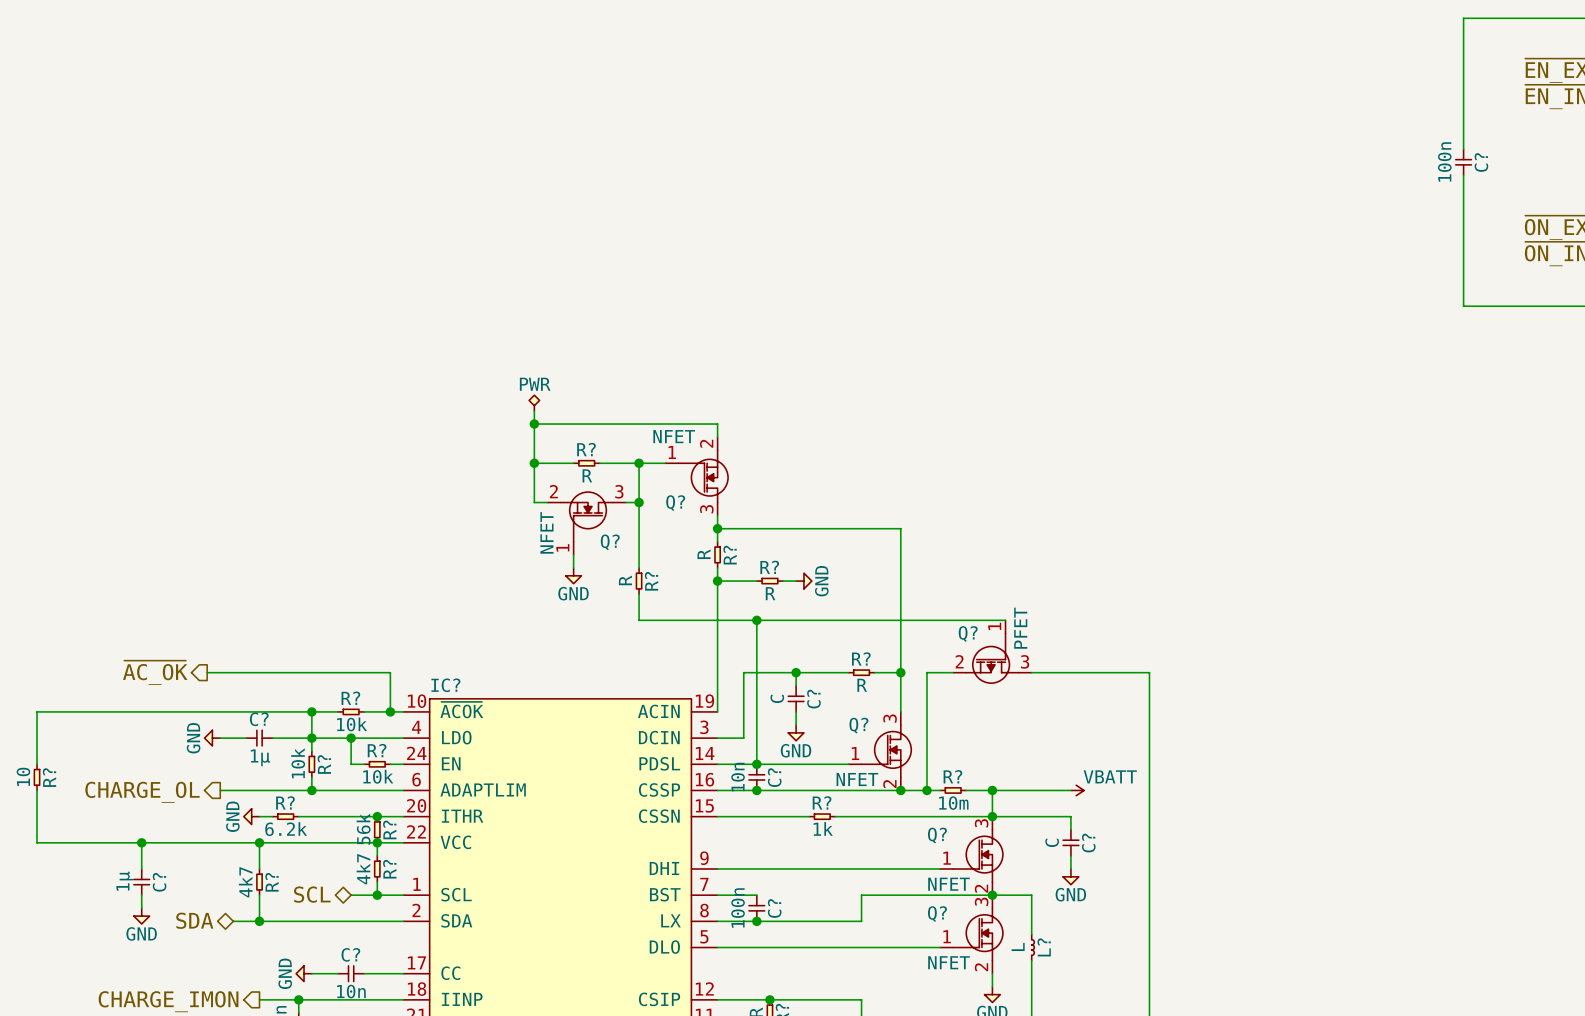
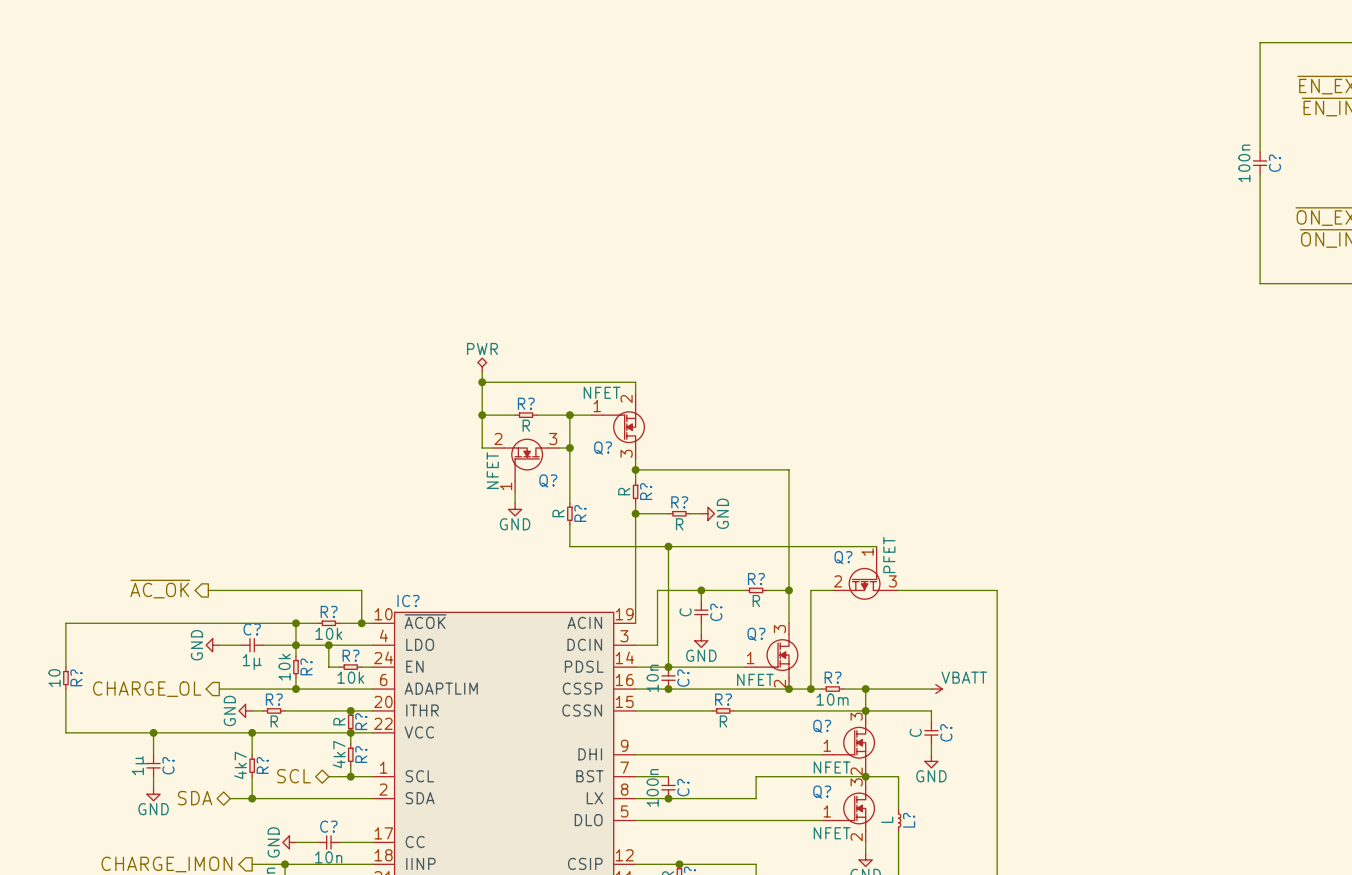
R? value: 1k (823, 828) -> R (723, 721)
R? value: 6.2k (286, 829) -> R (274, 721)
R? value: 56k (363, 829) -> R (339, 721)

